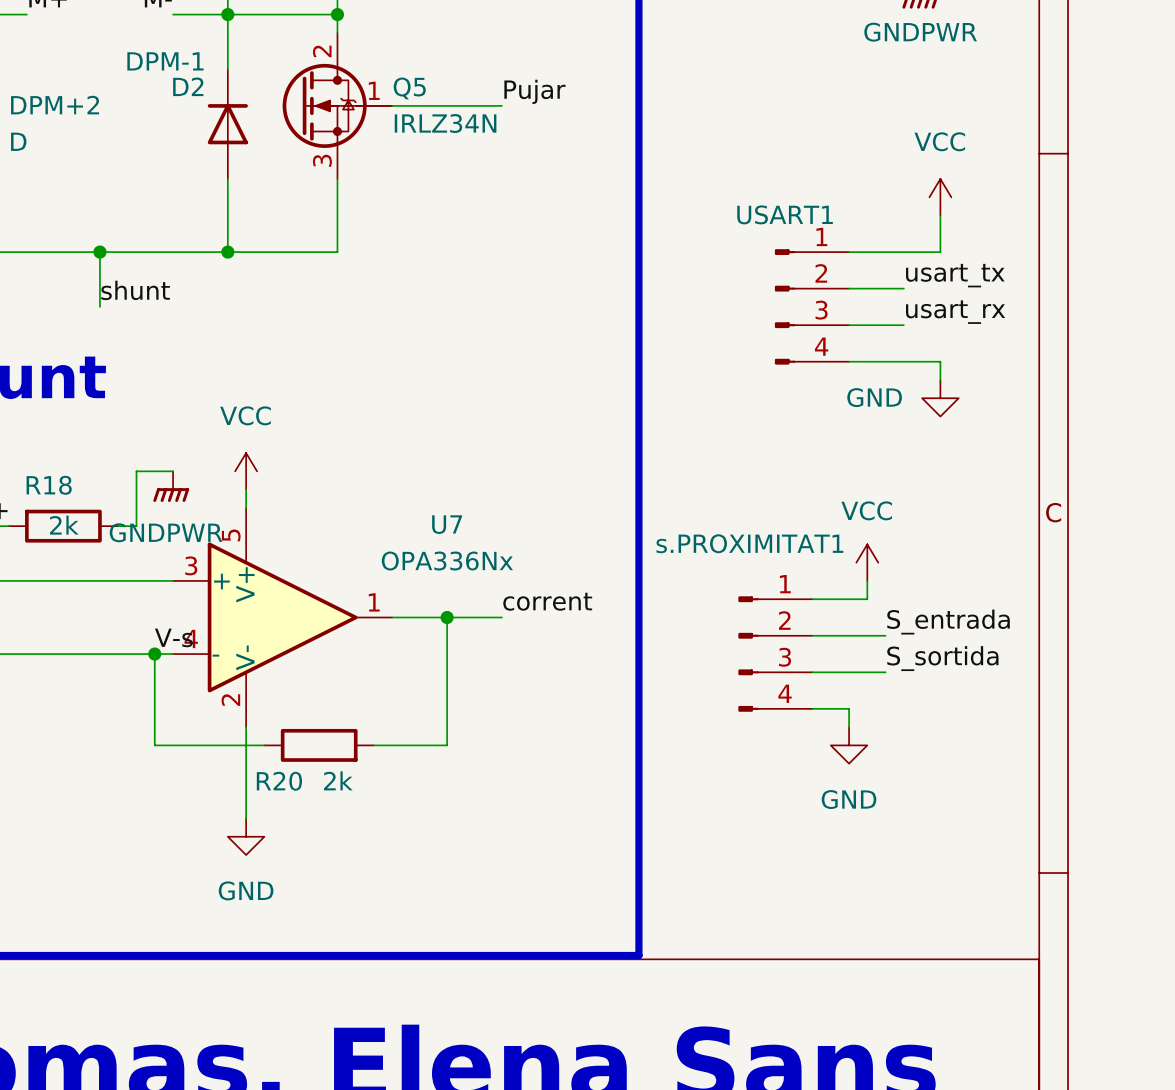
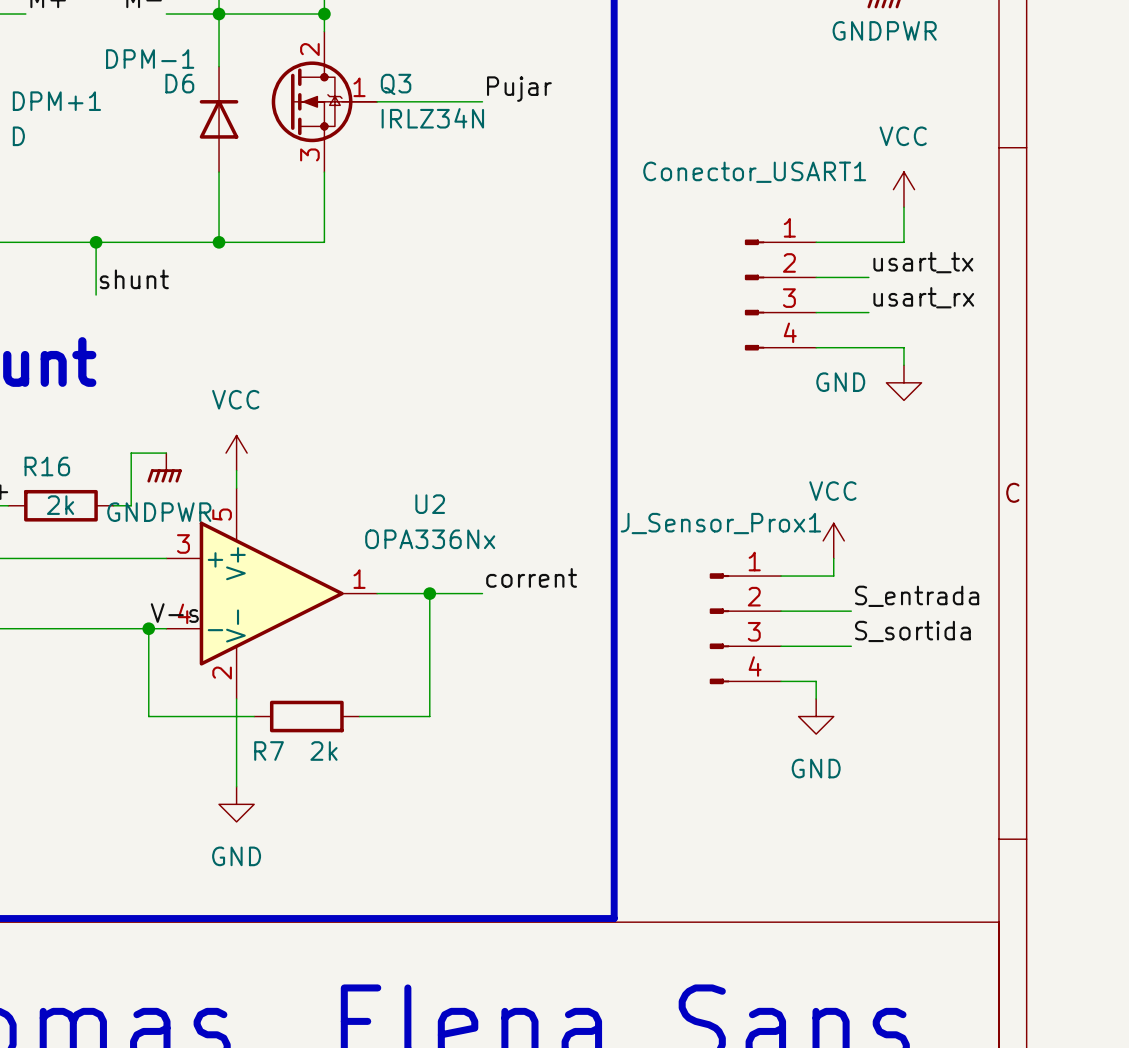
D2 name: D2 (188, 86) -> D6 (179, 83)
Q5 name: Q5 (409, 88) -> Q3 (396, 84)
DPM+2 name: DPM+2 (55, 105) -> DPM+1 (56, 101)
USART1 name: USART1 (785, 214) -> Conector_USART1 (754, 172)
R18 name: R18 (49, 485) -> R16 (47, 466)
U7 name: U7 (447, 524) -> U2 (430, 504)
s.PROXIMITAT1 name: s.PROXIMITAT1 (749, 543) -> J_Sensor_Prox1 (720, 523)
R20 name: R20 (279, 781) -> R7 (269, 751)

